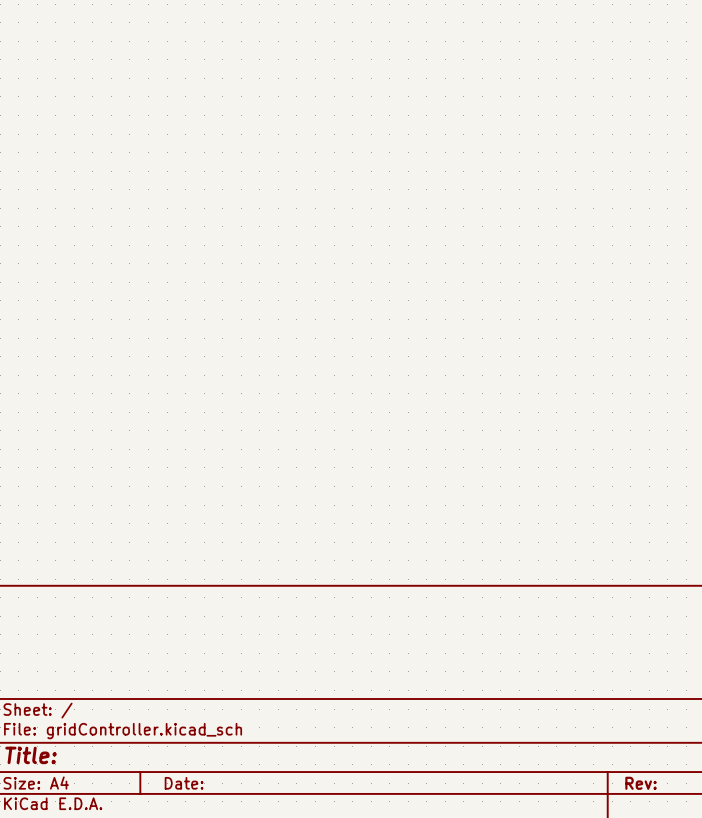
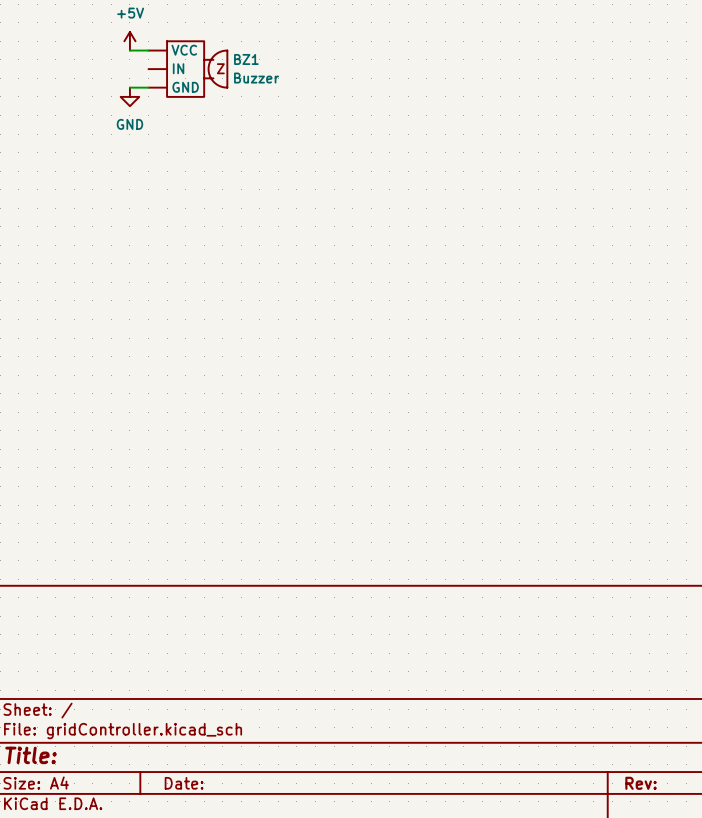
power symbol: none -> +5V (129, 41)
wire: none -> (129, 50) (148, 50)
BZ1: none -> Buzzer (187, 69)
wire: none -> (129, 87) (148, 87)
power symbol: none -> GND (129, 96)

